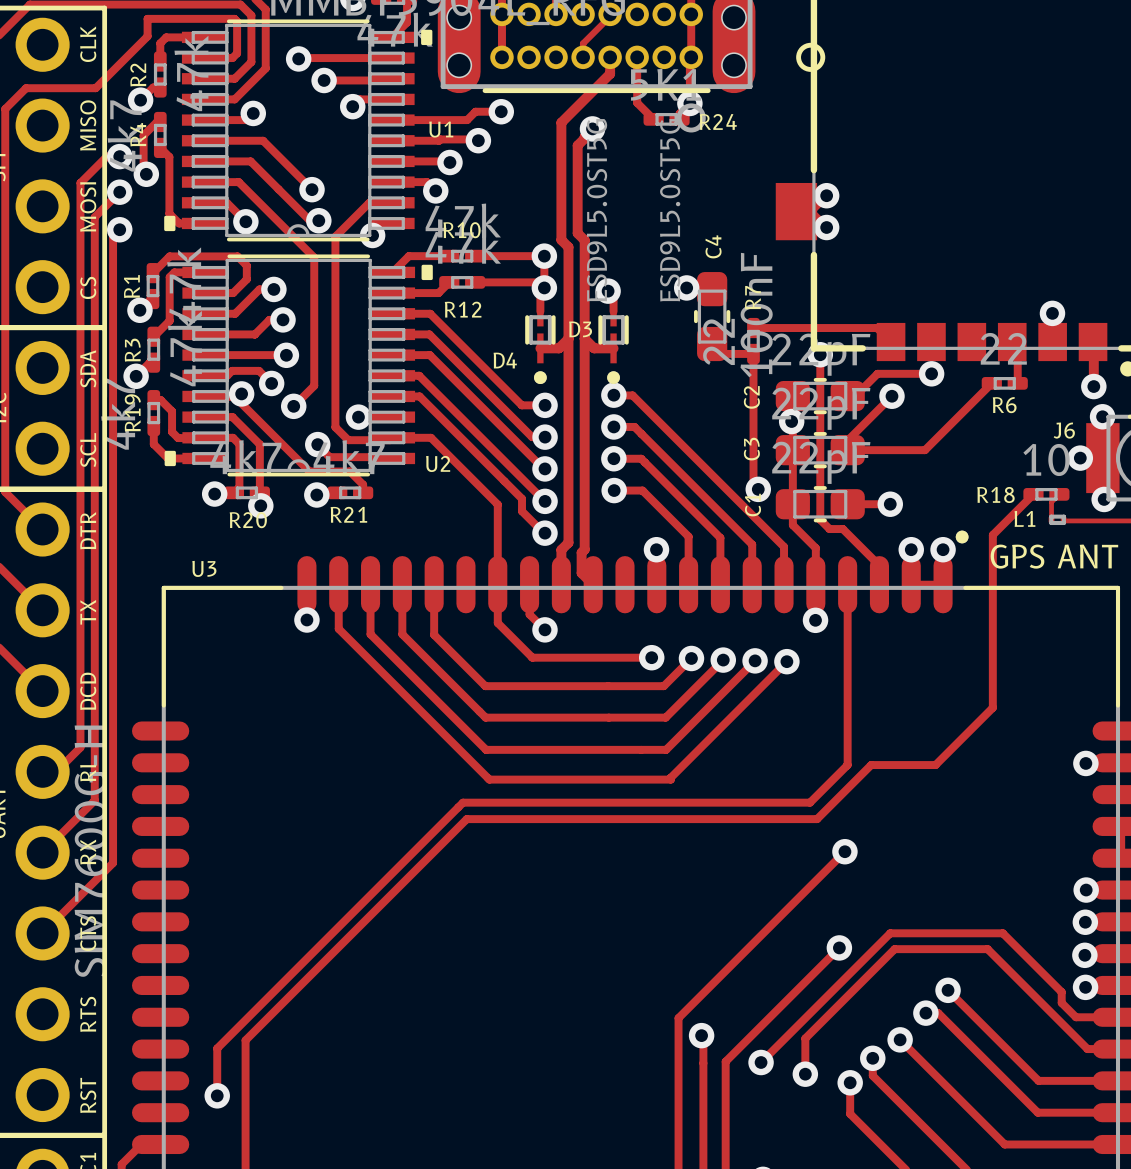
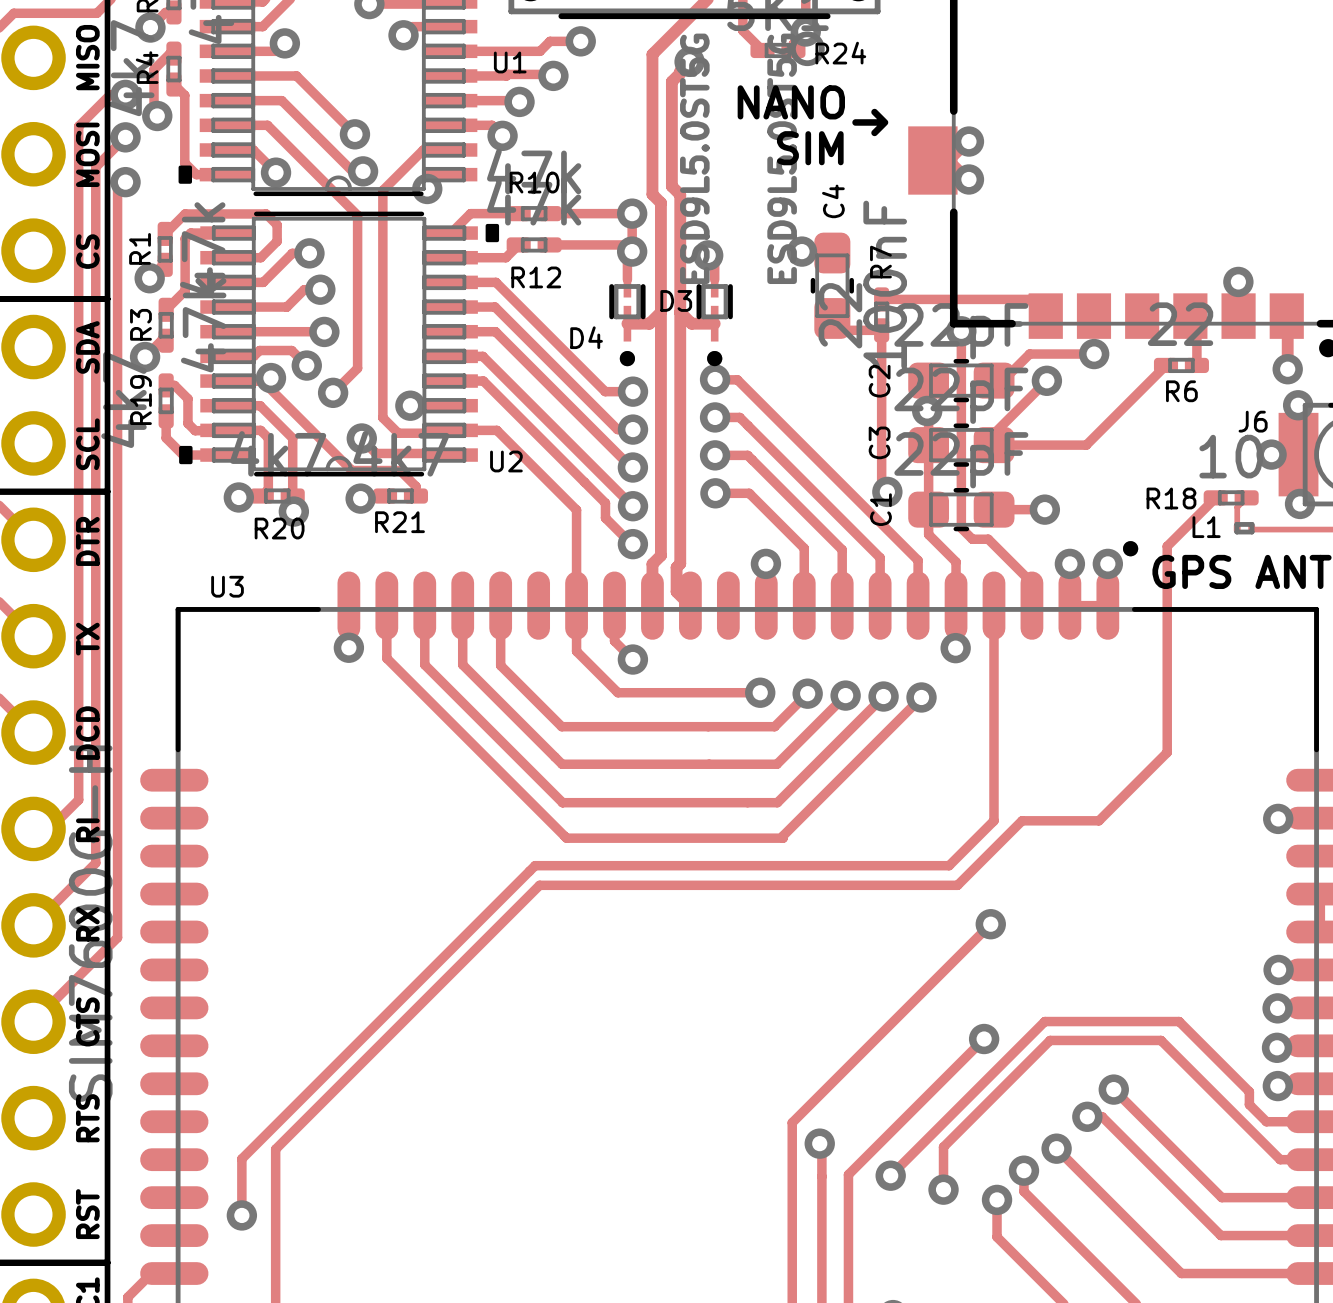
text: none -> NANO (791, 102)
drawing: none -> [852, 108, 889, 137]
text: none -> SIM (810, 148)

